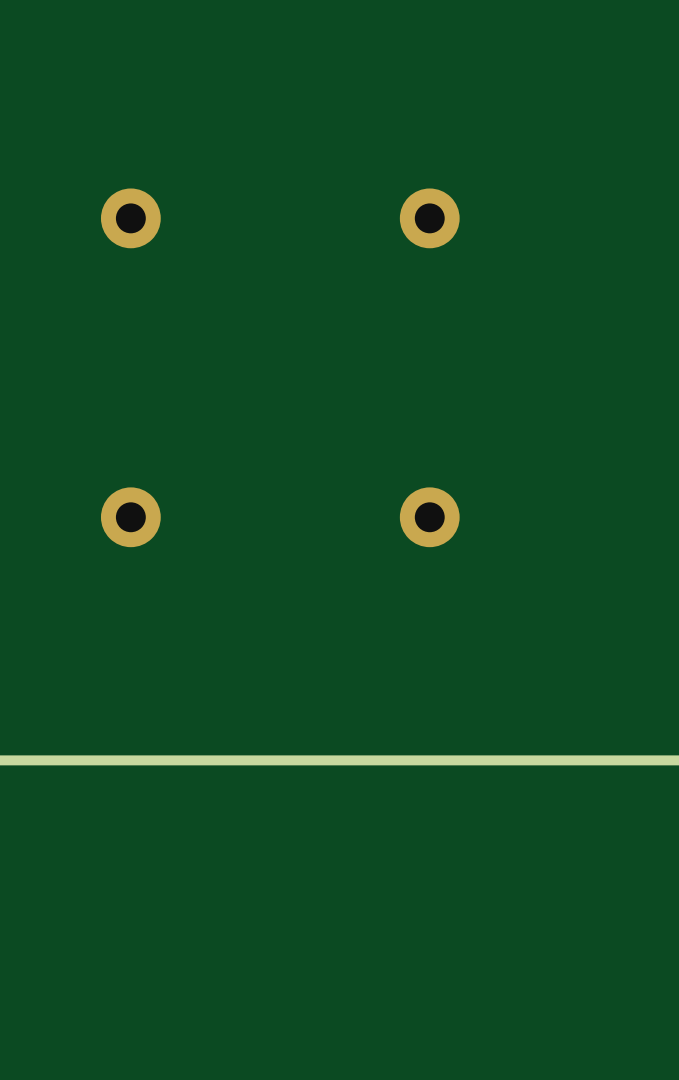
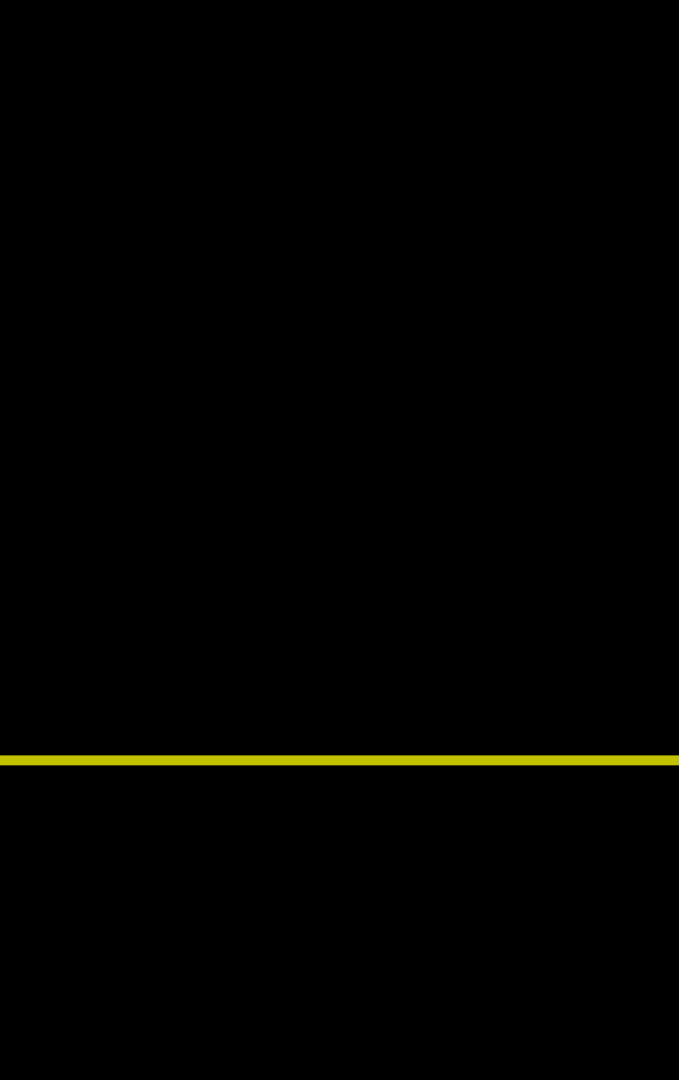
via: (130, 218) -> none
via: (429, 218) -> none
via: (130, 517) -> none
via: (429, 517) -> none

